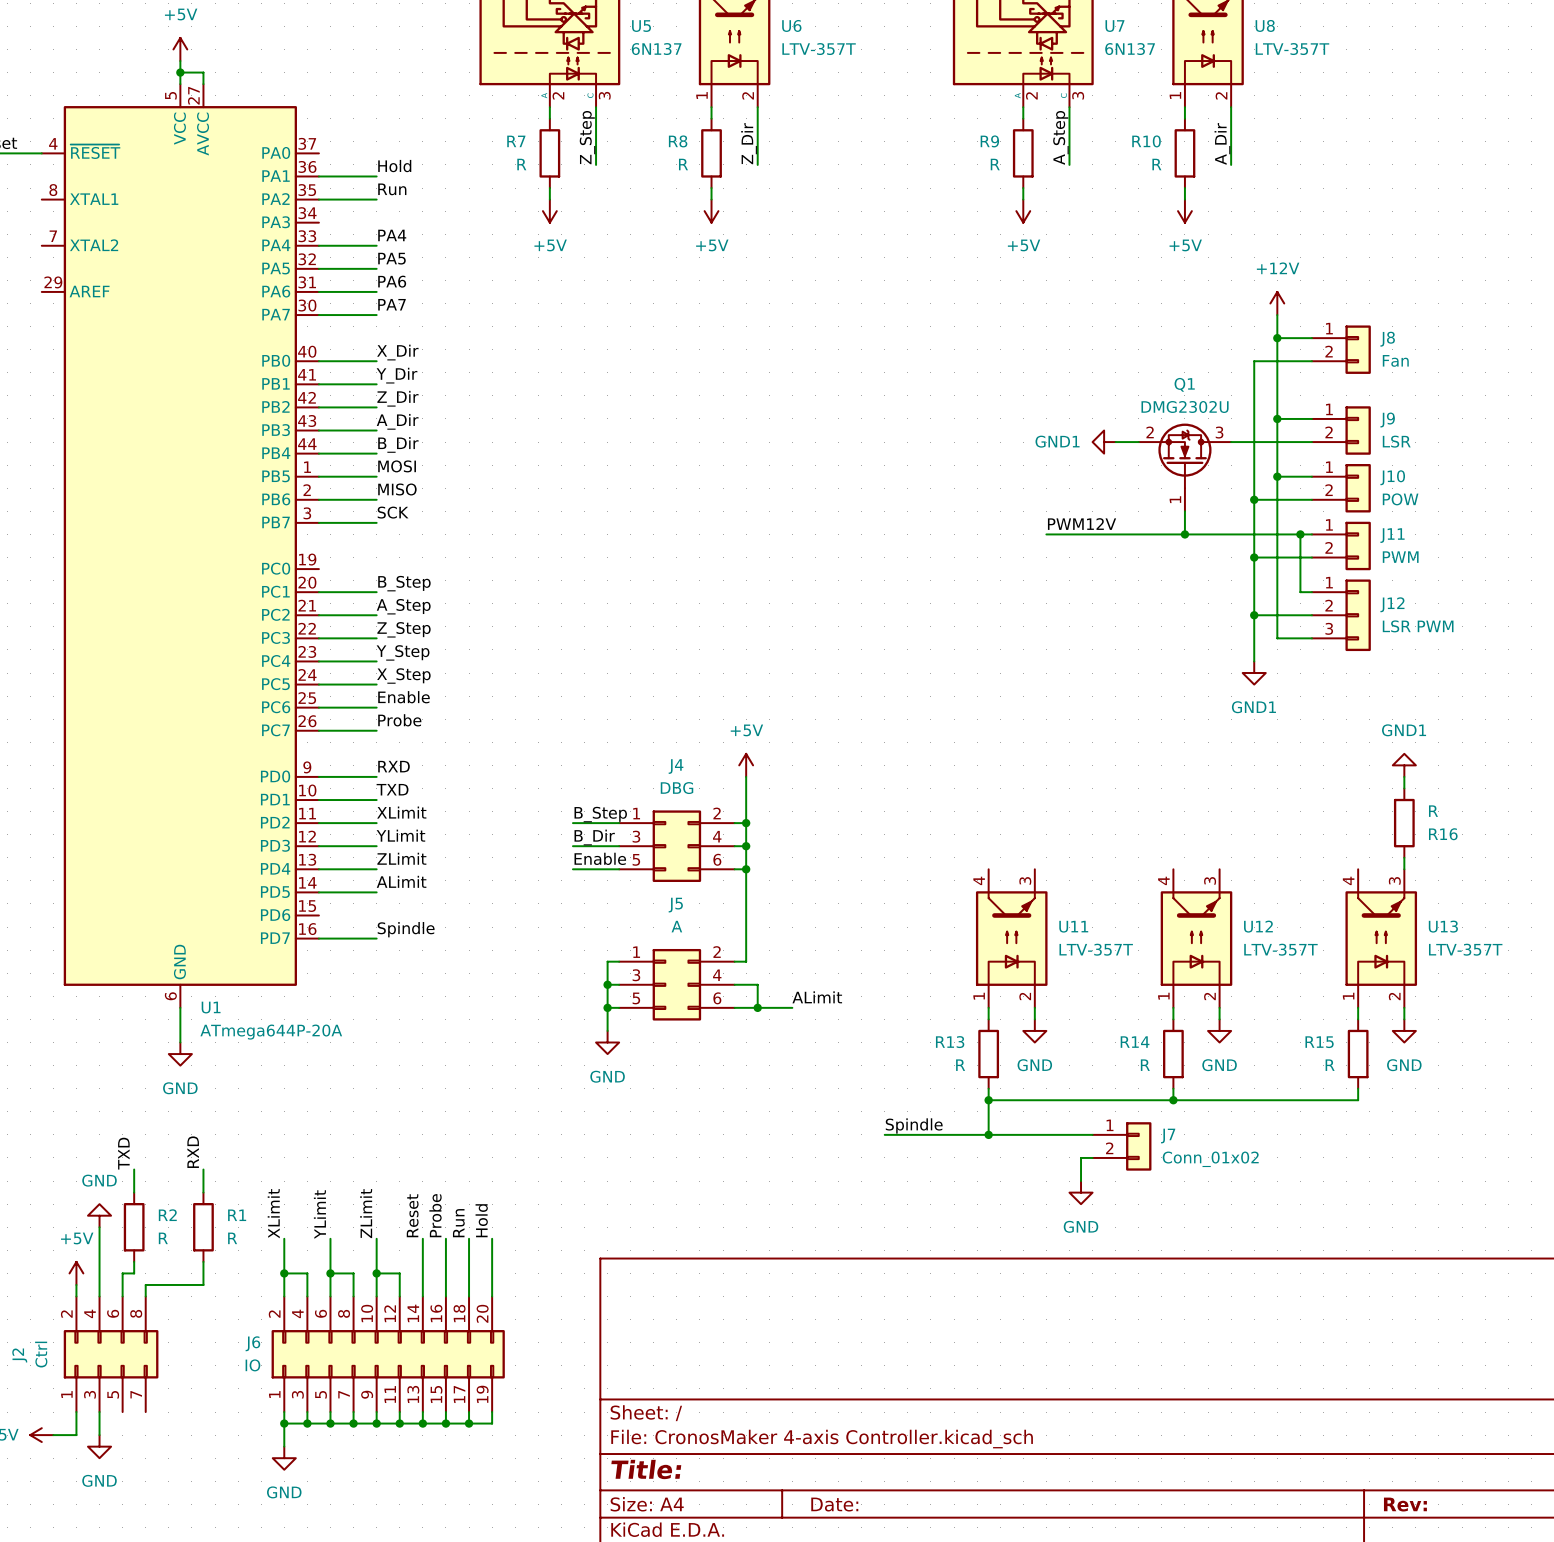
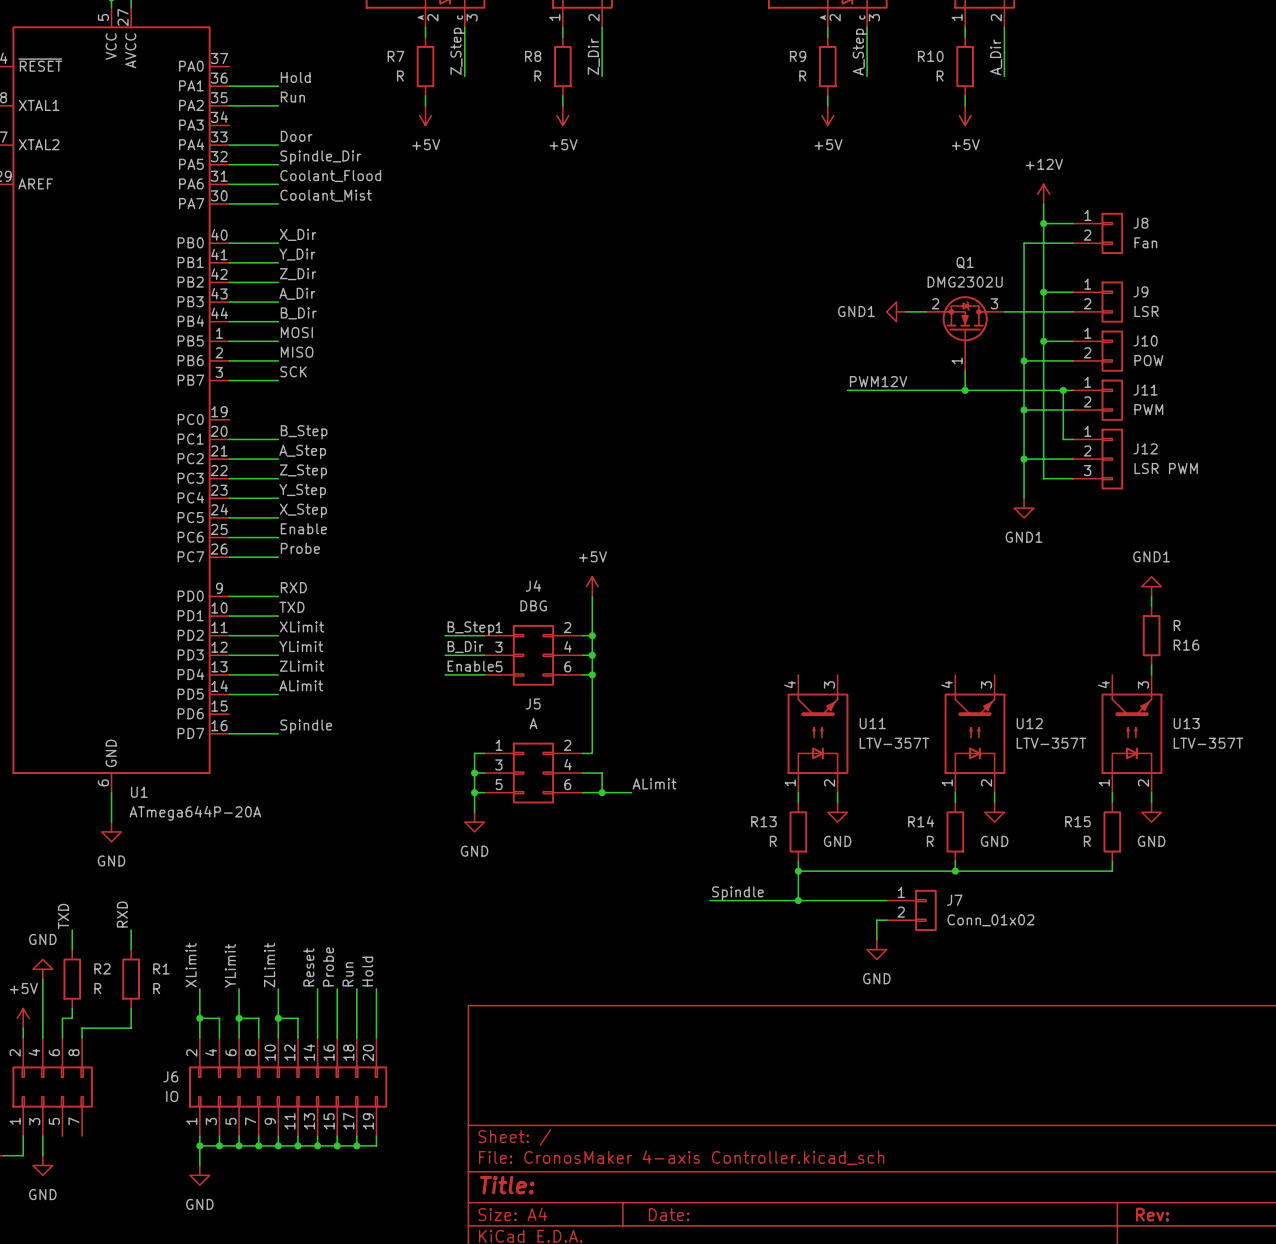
label: PA4 (392, 235) -> Door (296, 136)
label: PA5 (391, 258) -> Spindle_Dir (320, 157)
label: PA6 (392, 281) -> Coolant_Flood (330, 176)
label: PA7 (391, 304) -> Coolant_Mist (326, 195)

